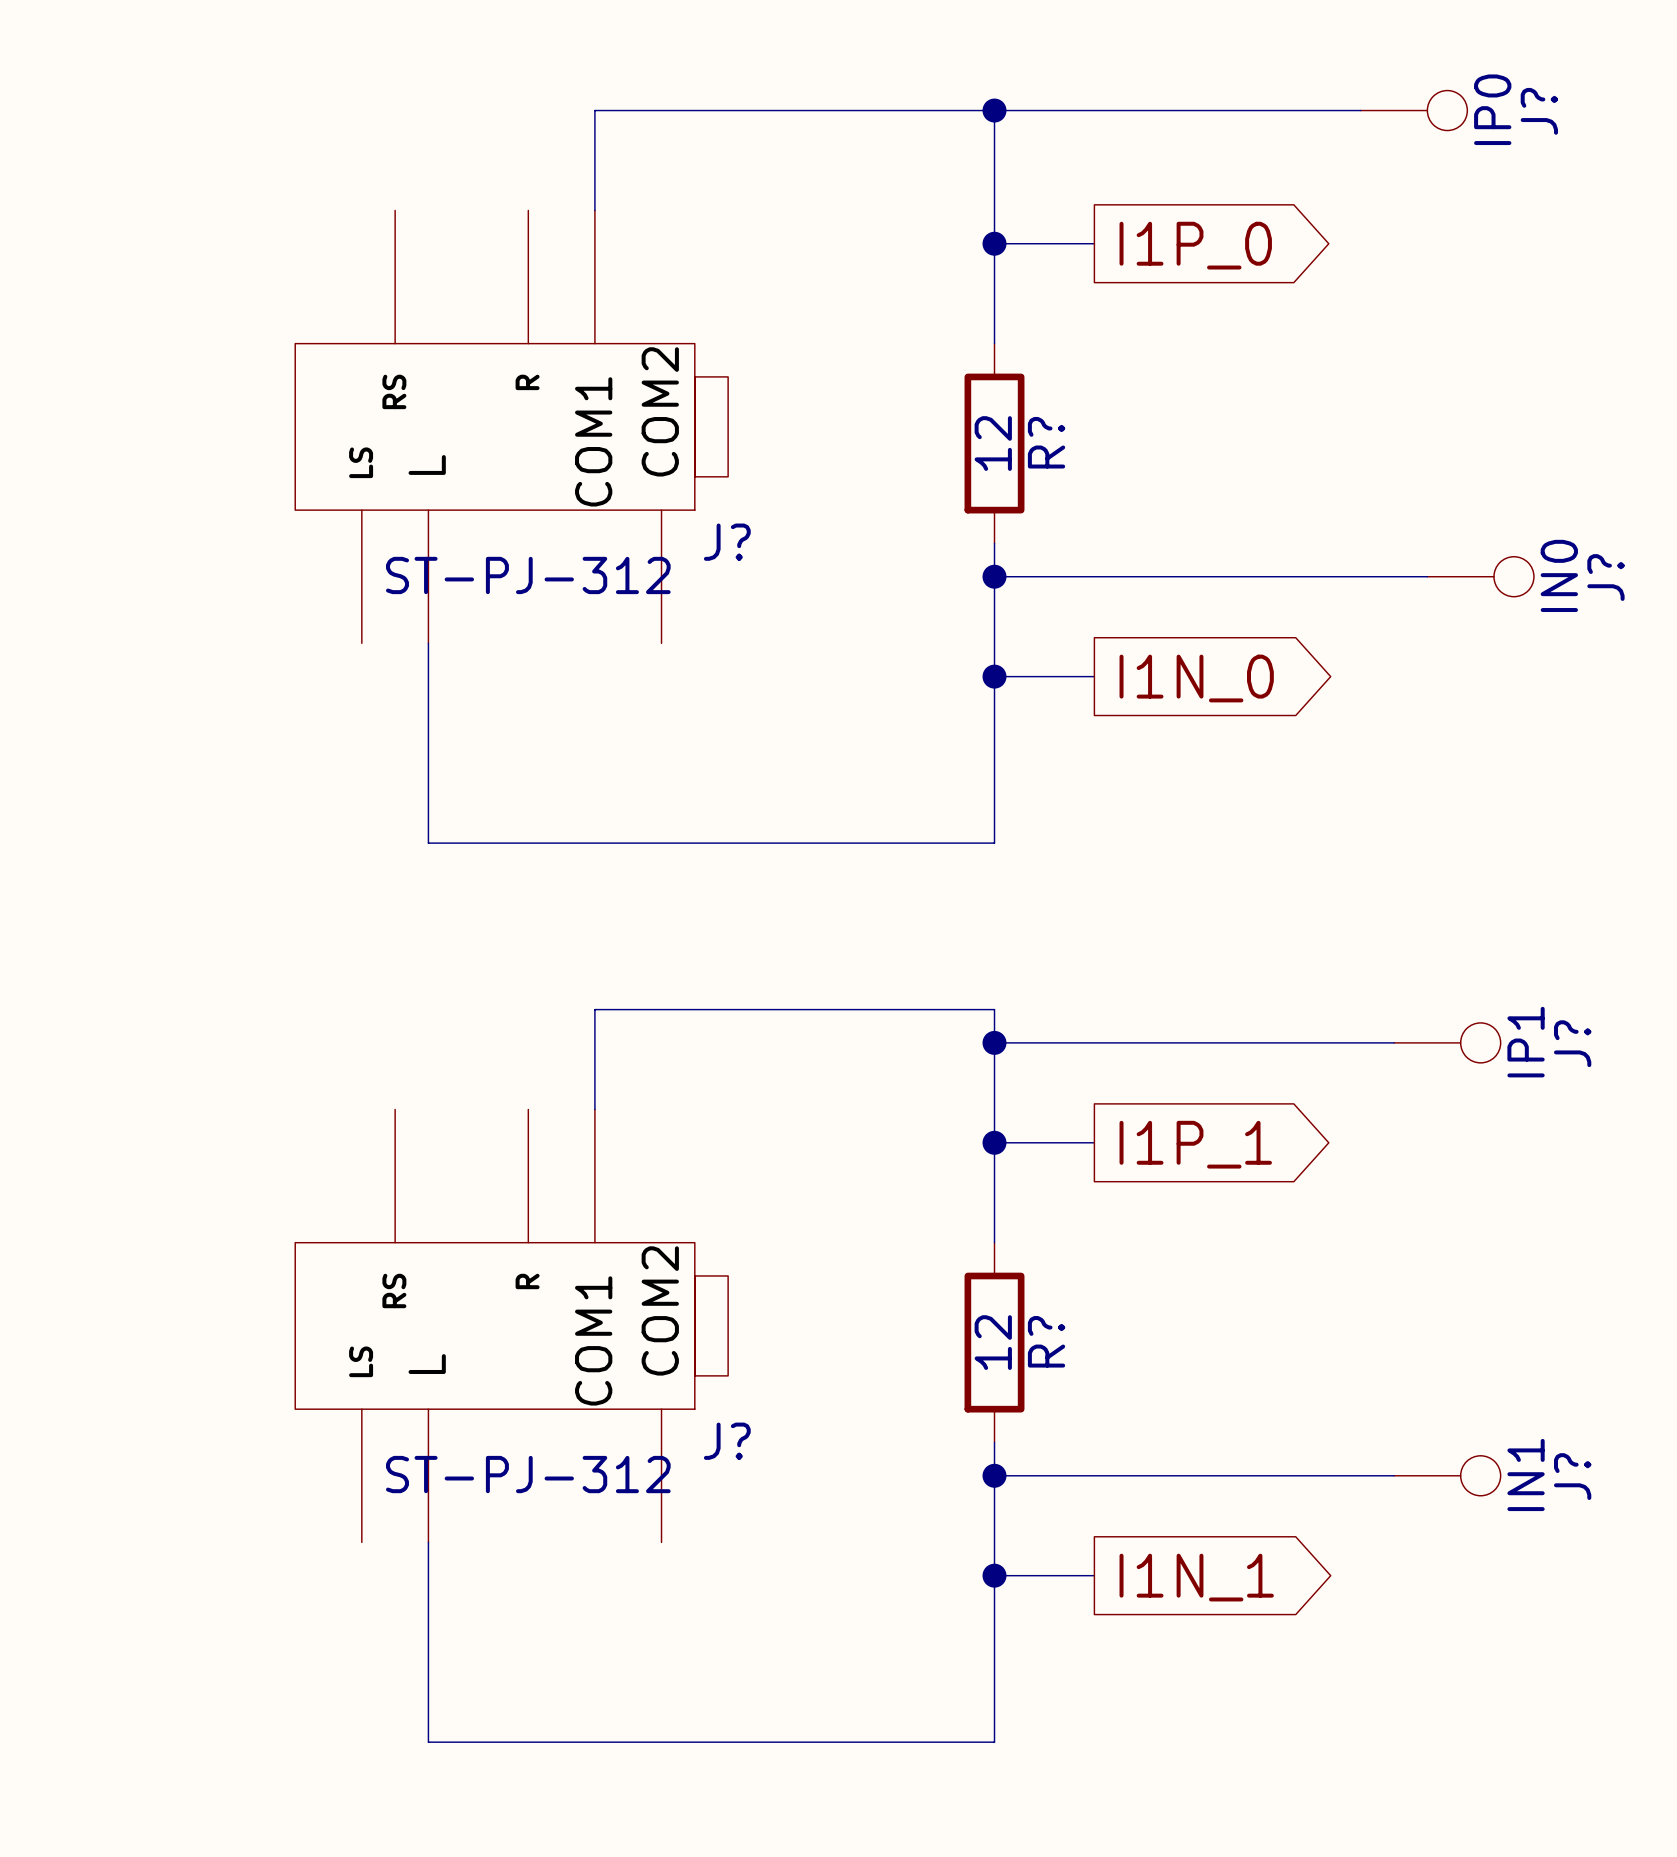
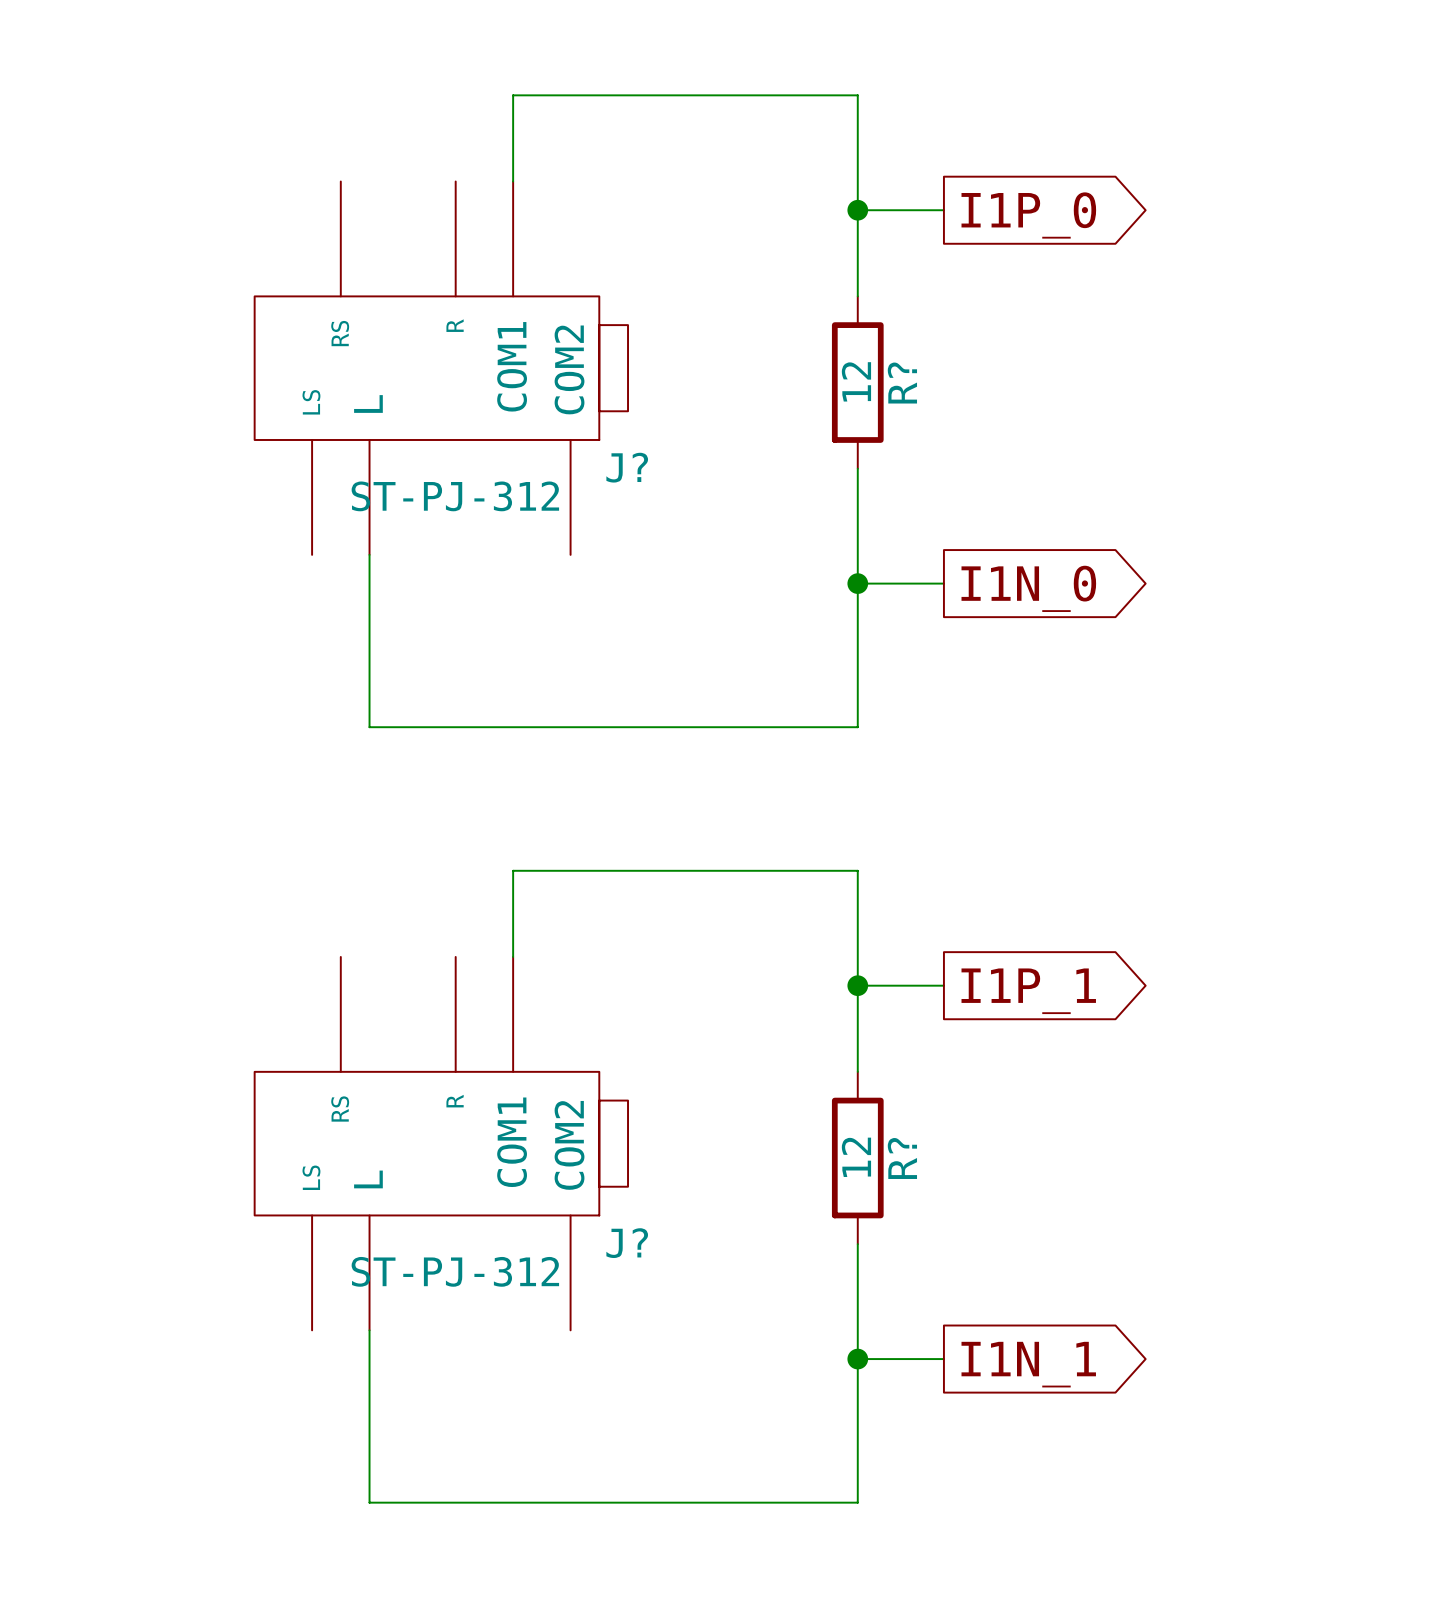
wire: (994, 110) (1360, 110) -> none
junction: (994, 110) -> none
J?: IP0 (1414, 110) -> none
wire: (994, 576) (1427, 576) -> none
junction: (994, 576) -> none
J?: IN0 (1480, 576) -> none
wire: (994, 1042) (1394, 1042) -> none
junction: (994, 1042) -> none
J?: IP1 (1447, 1042) -> none
wire: (994, 1475) (1394, 1475) -> none
junction: (994, 1475) -> none
J?: IN1 (1447, 1475) -> none

